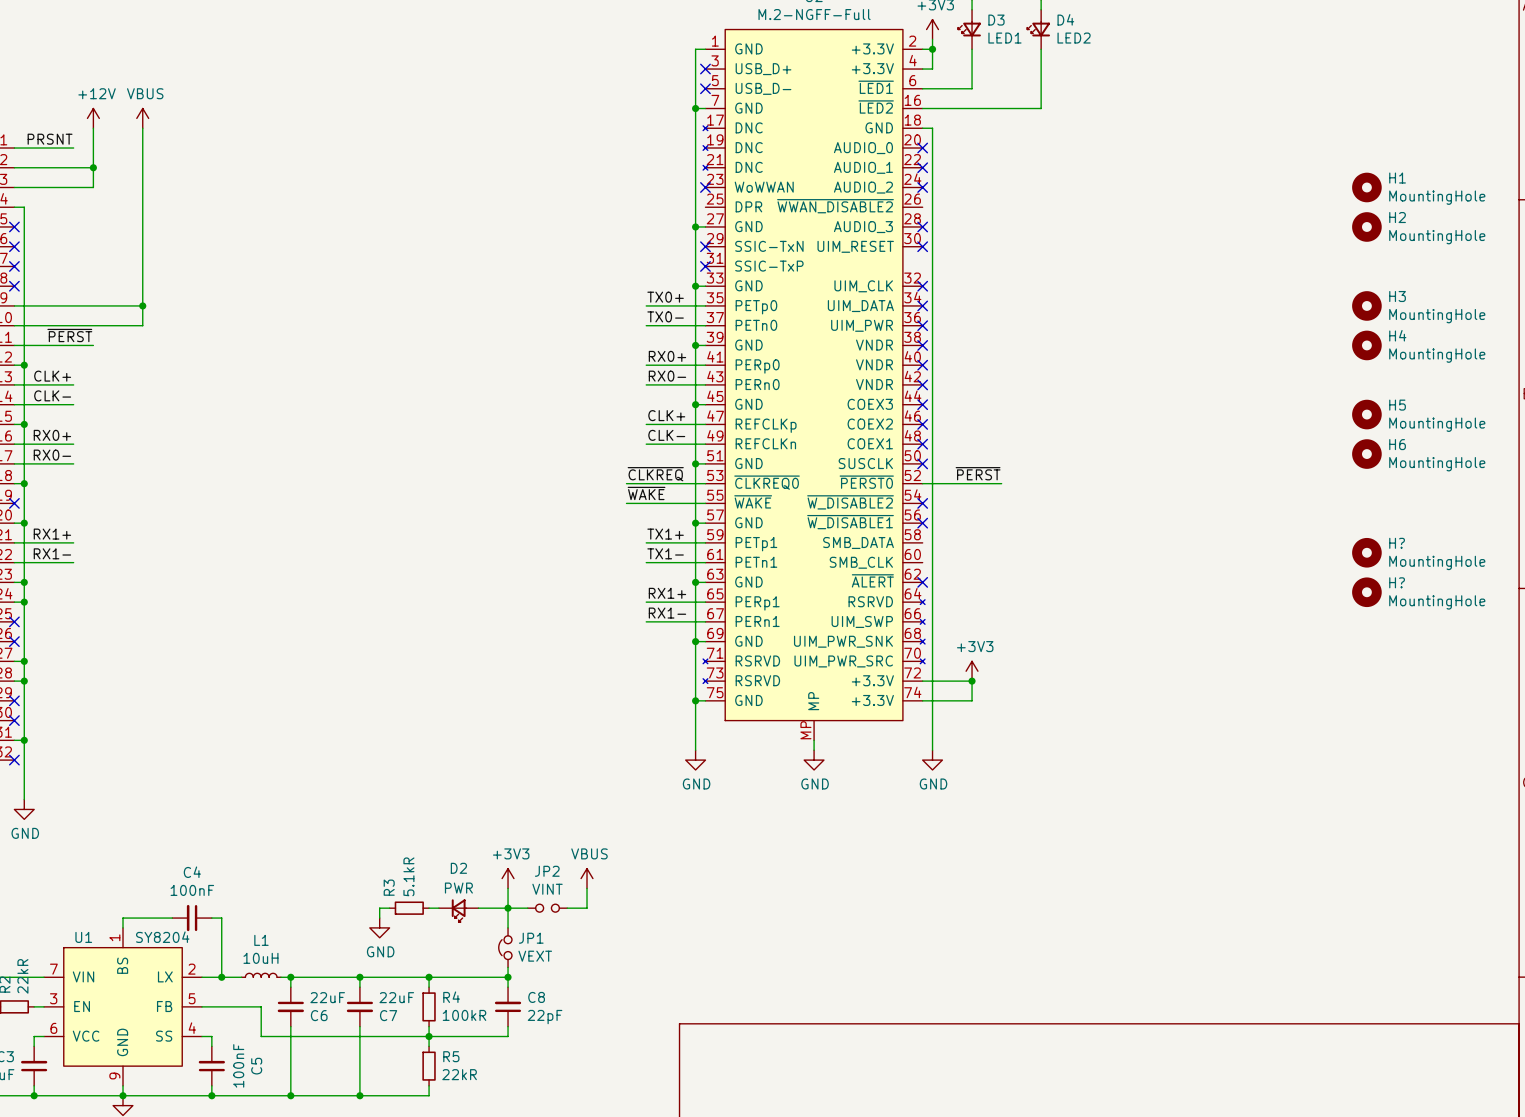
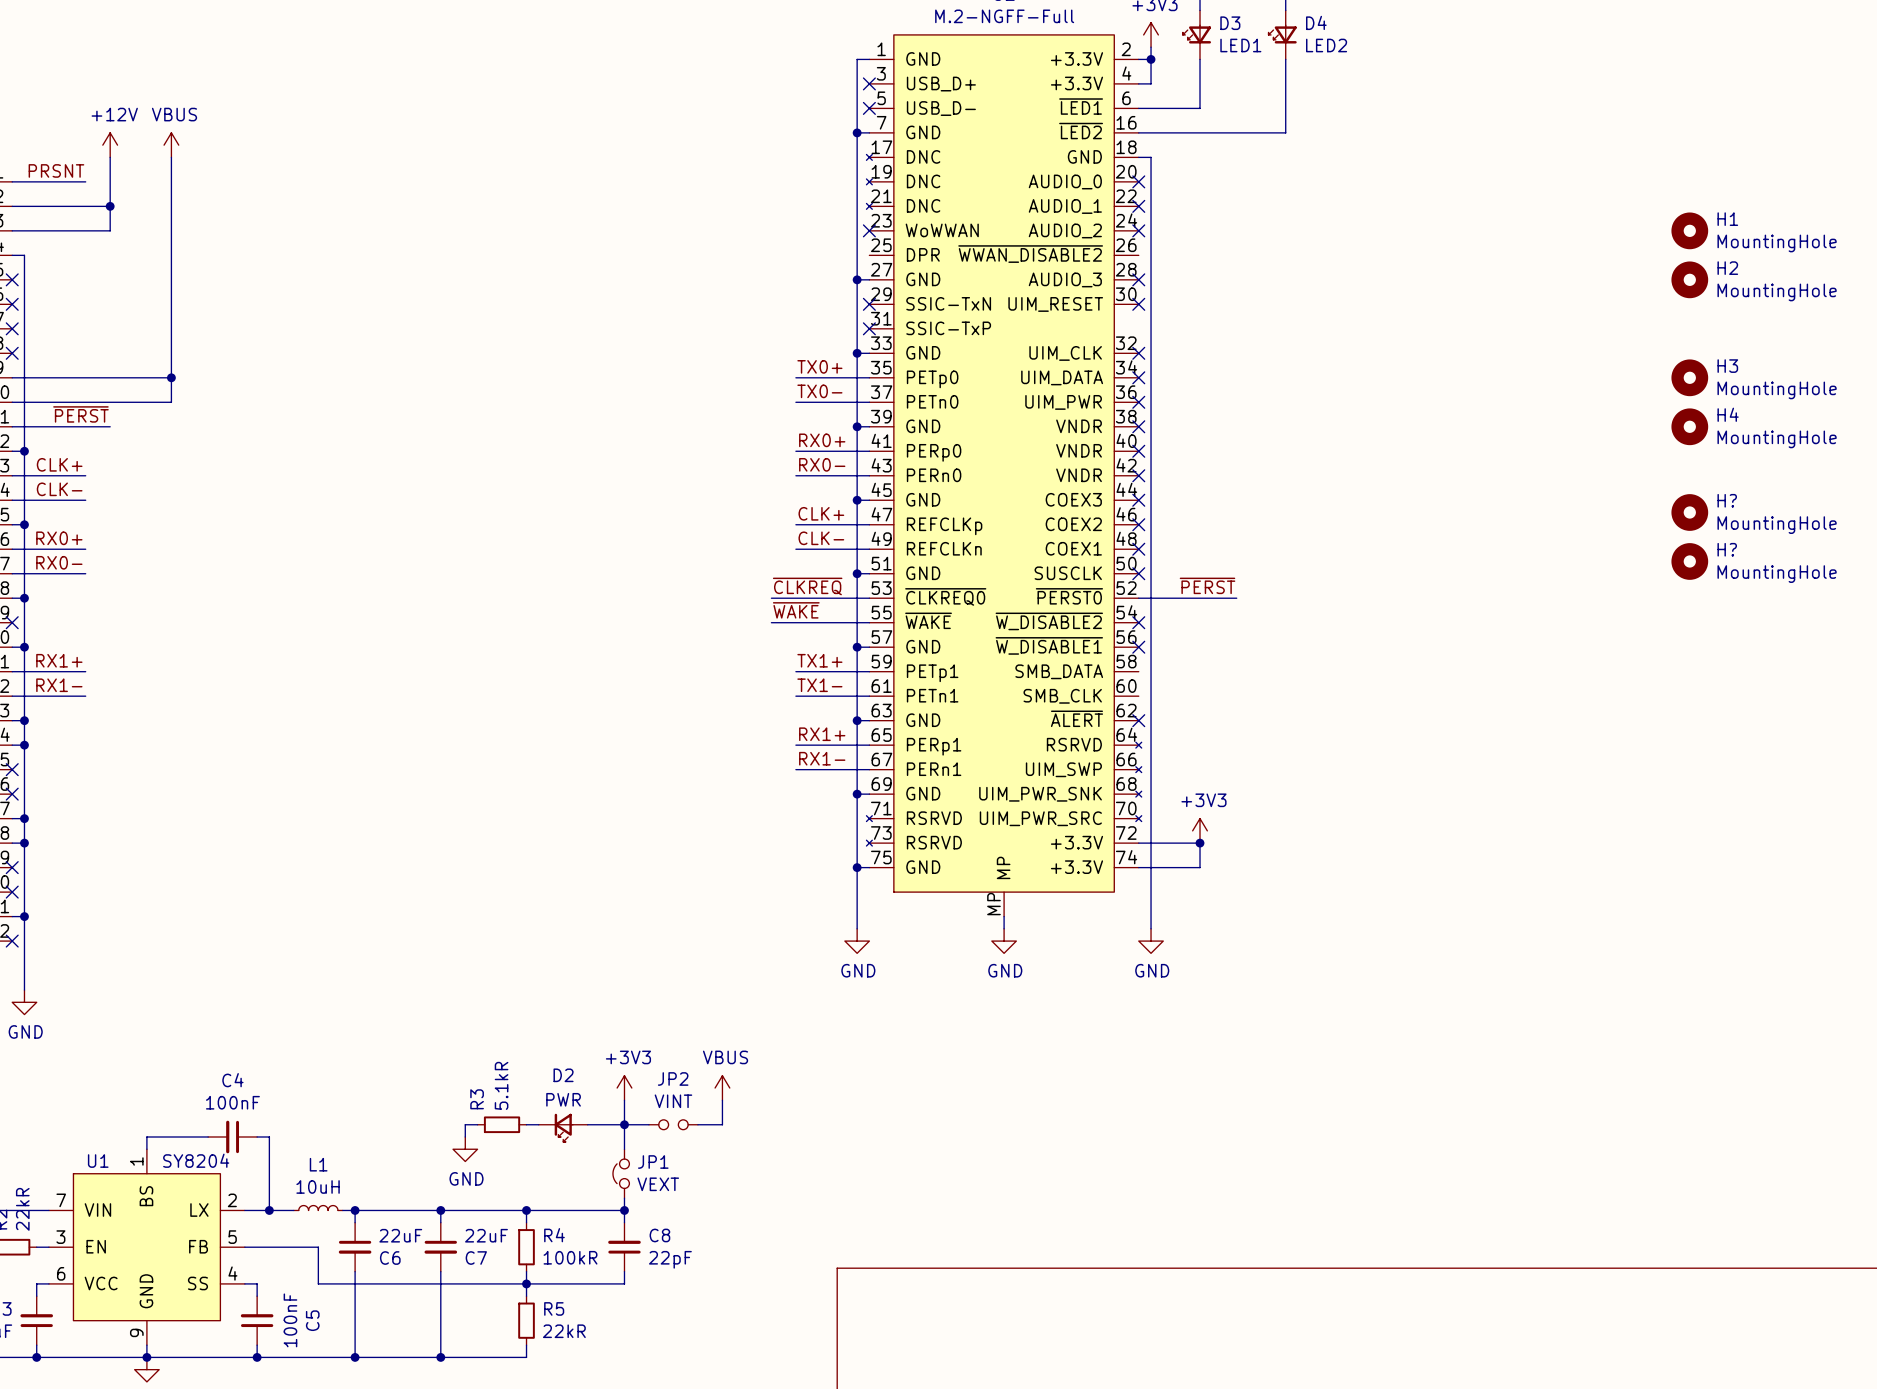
H5 name: H5 (1397, 405) -> H? (1727, 500)
H6 name: H6 (1397, 444) -> H? (1727, 549)
H?: MountingHole (1366, 552) -> none
H?: MountingHole (1366, 592) -> none

